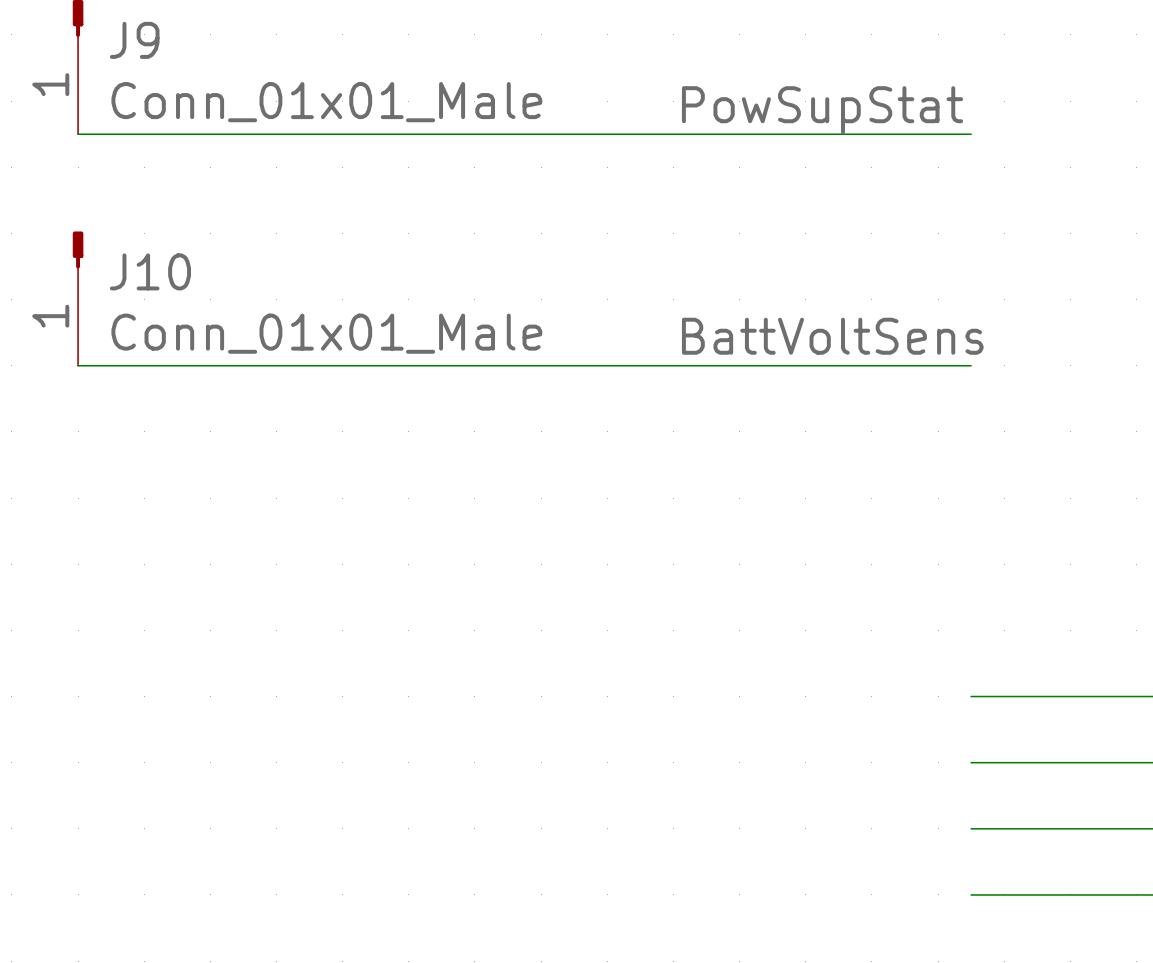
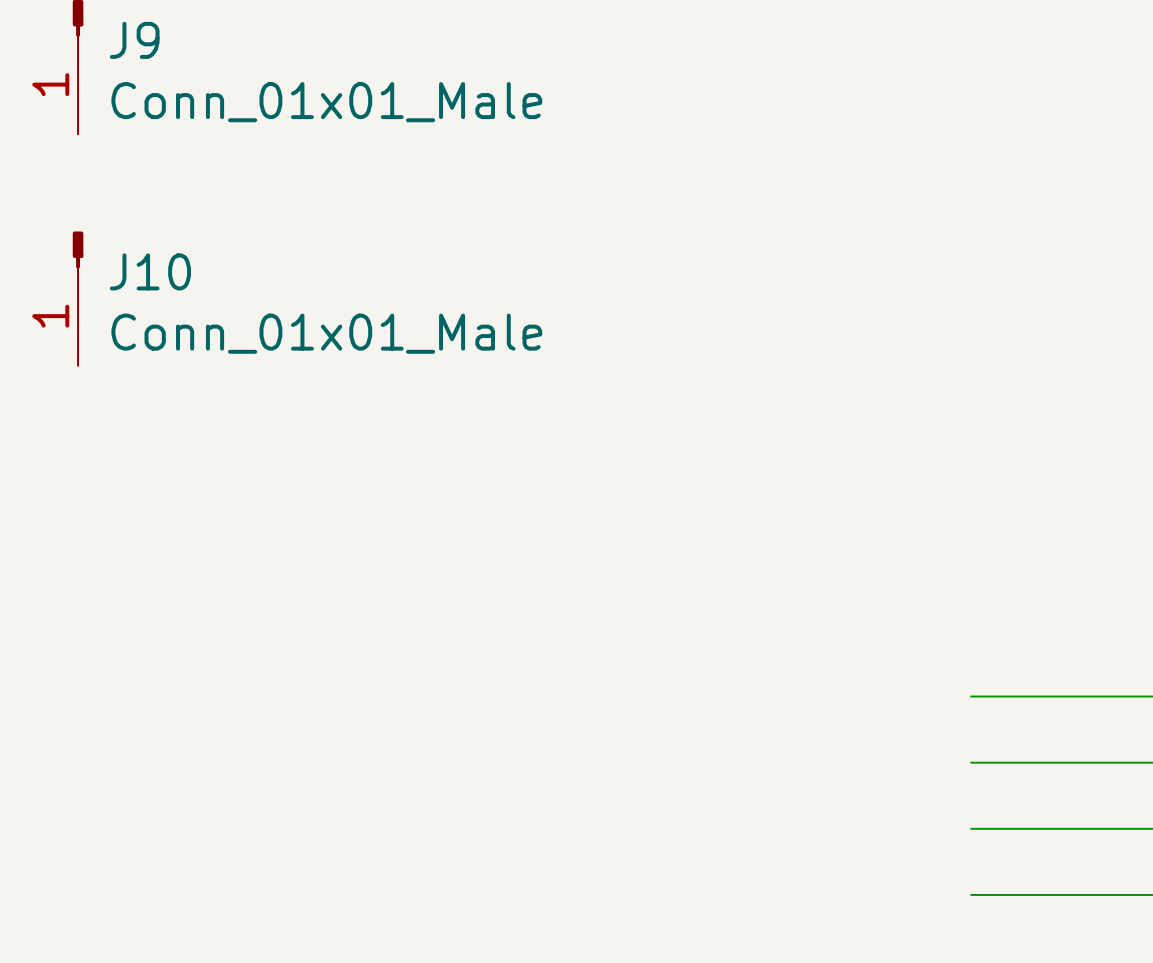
label: PowSupStat (822, 110) -> none
wire: (78, 134) (971, 134) -> none
label: BattVoltSens (832, 336) -> none
wire: (78, 365) (971, 365) -> none

